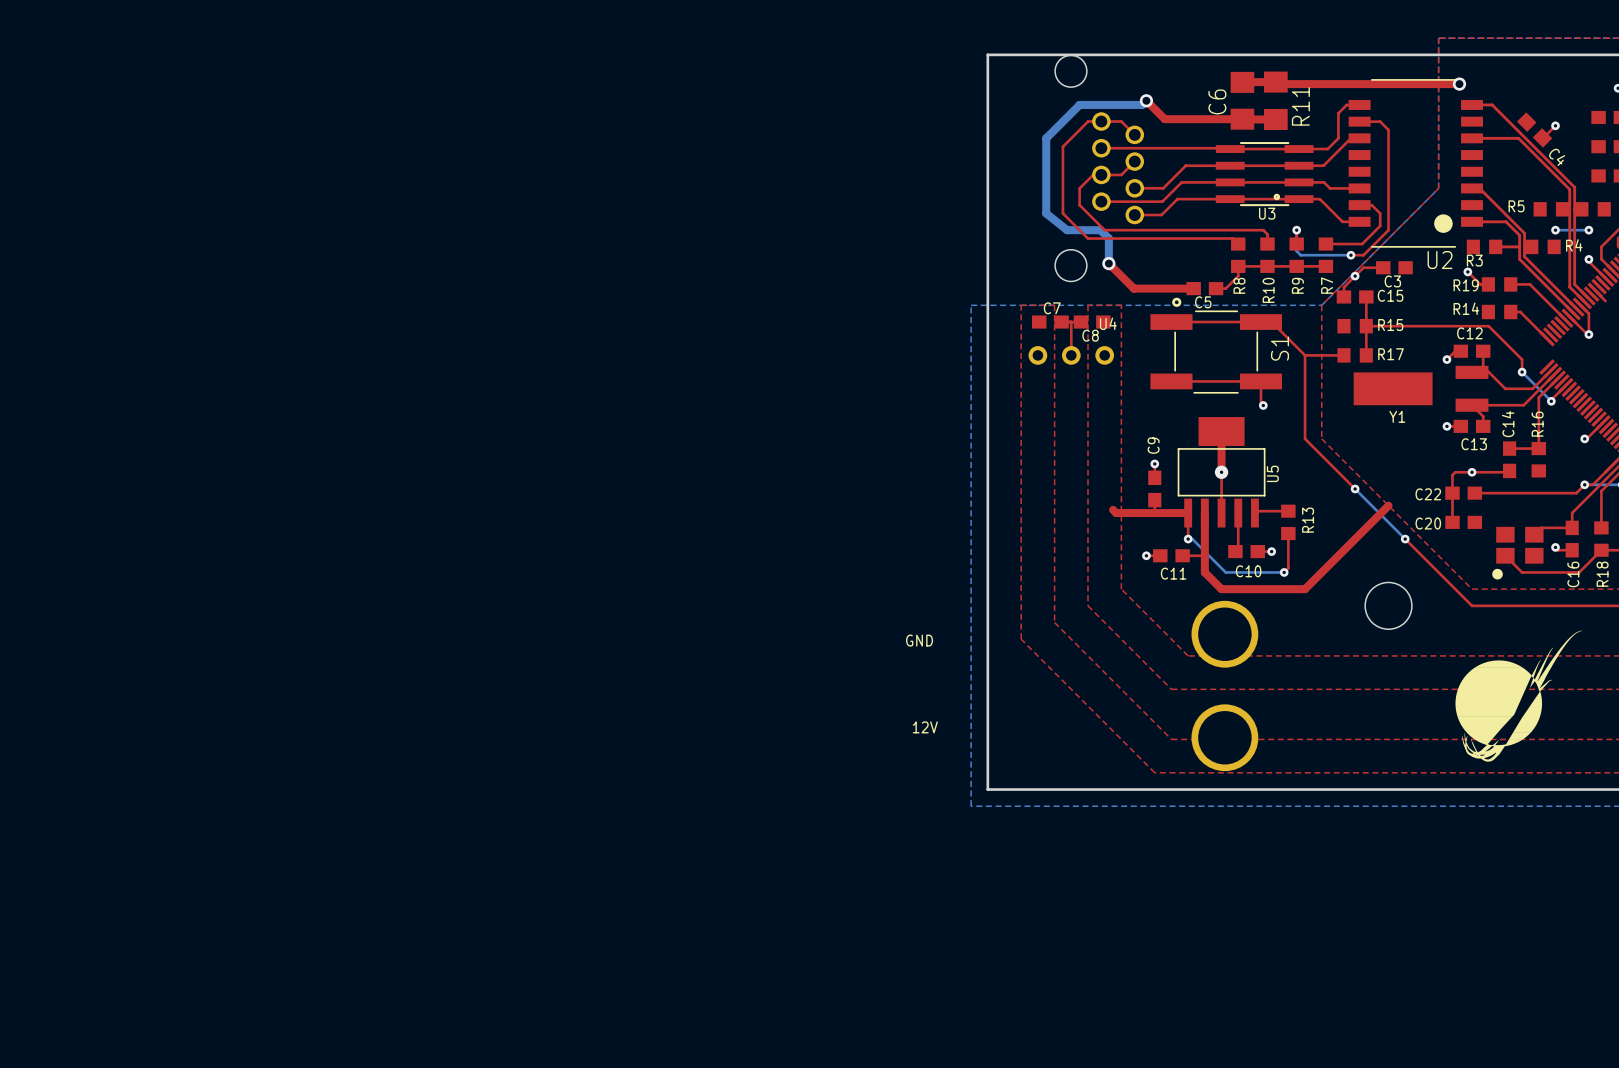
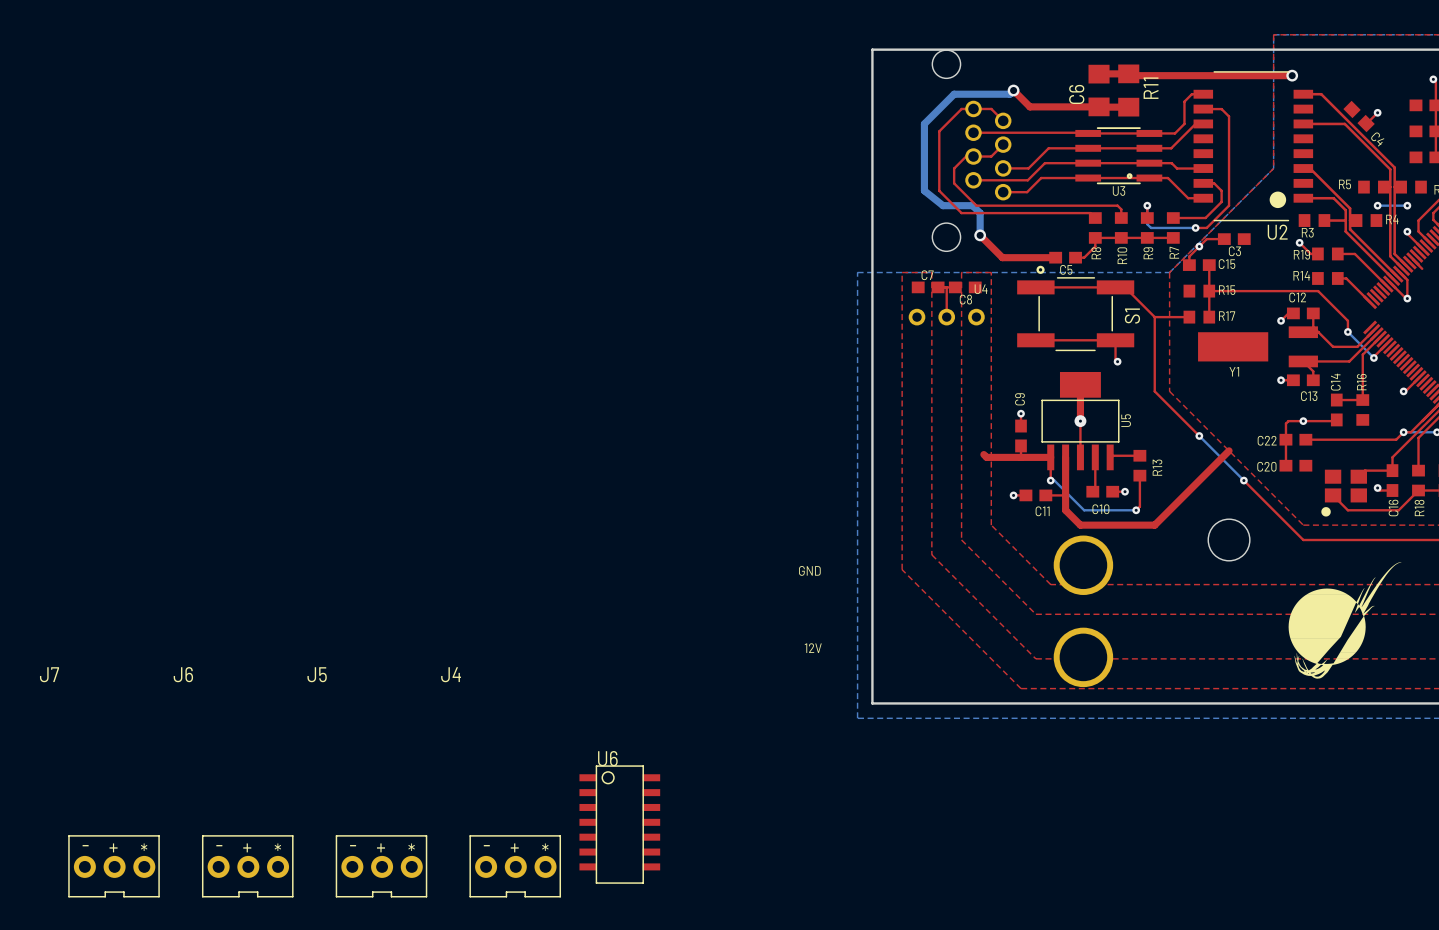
U6: none -> (619, 824)
J7: none -> (114, 866)
J6: none -> (247, 866)
J5: none -> (381, 866)
J4: none -> (515, 866)

